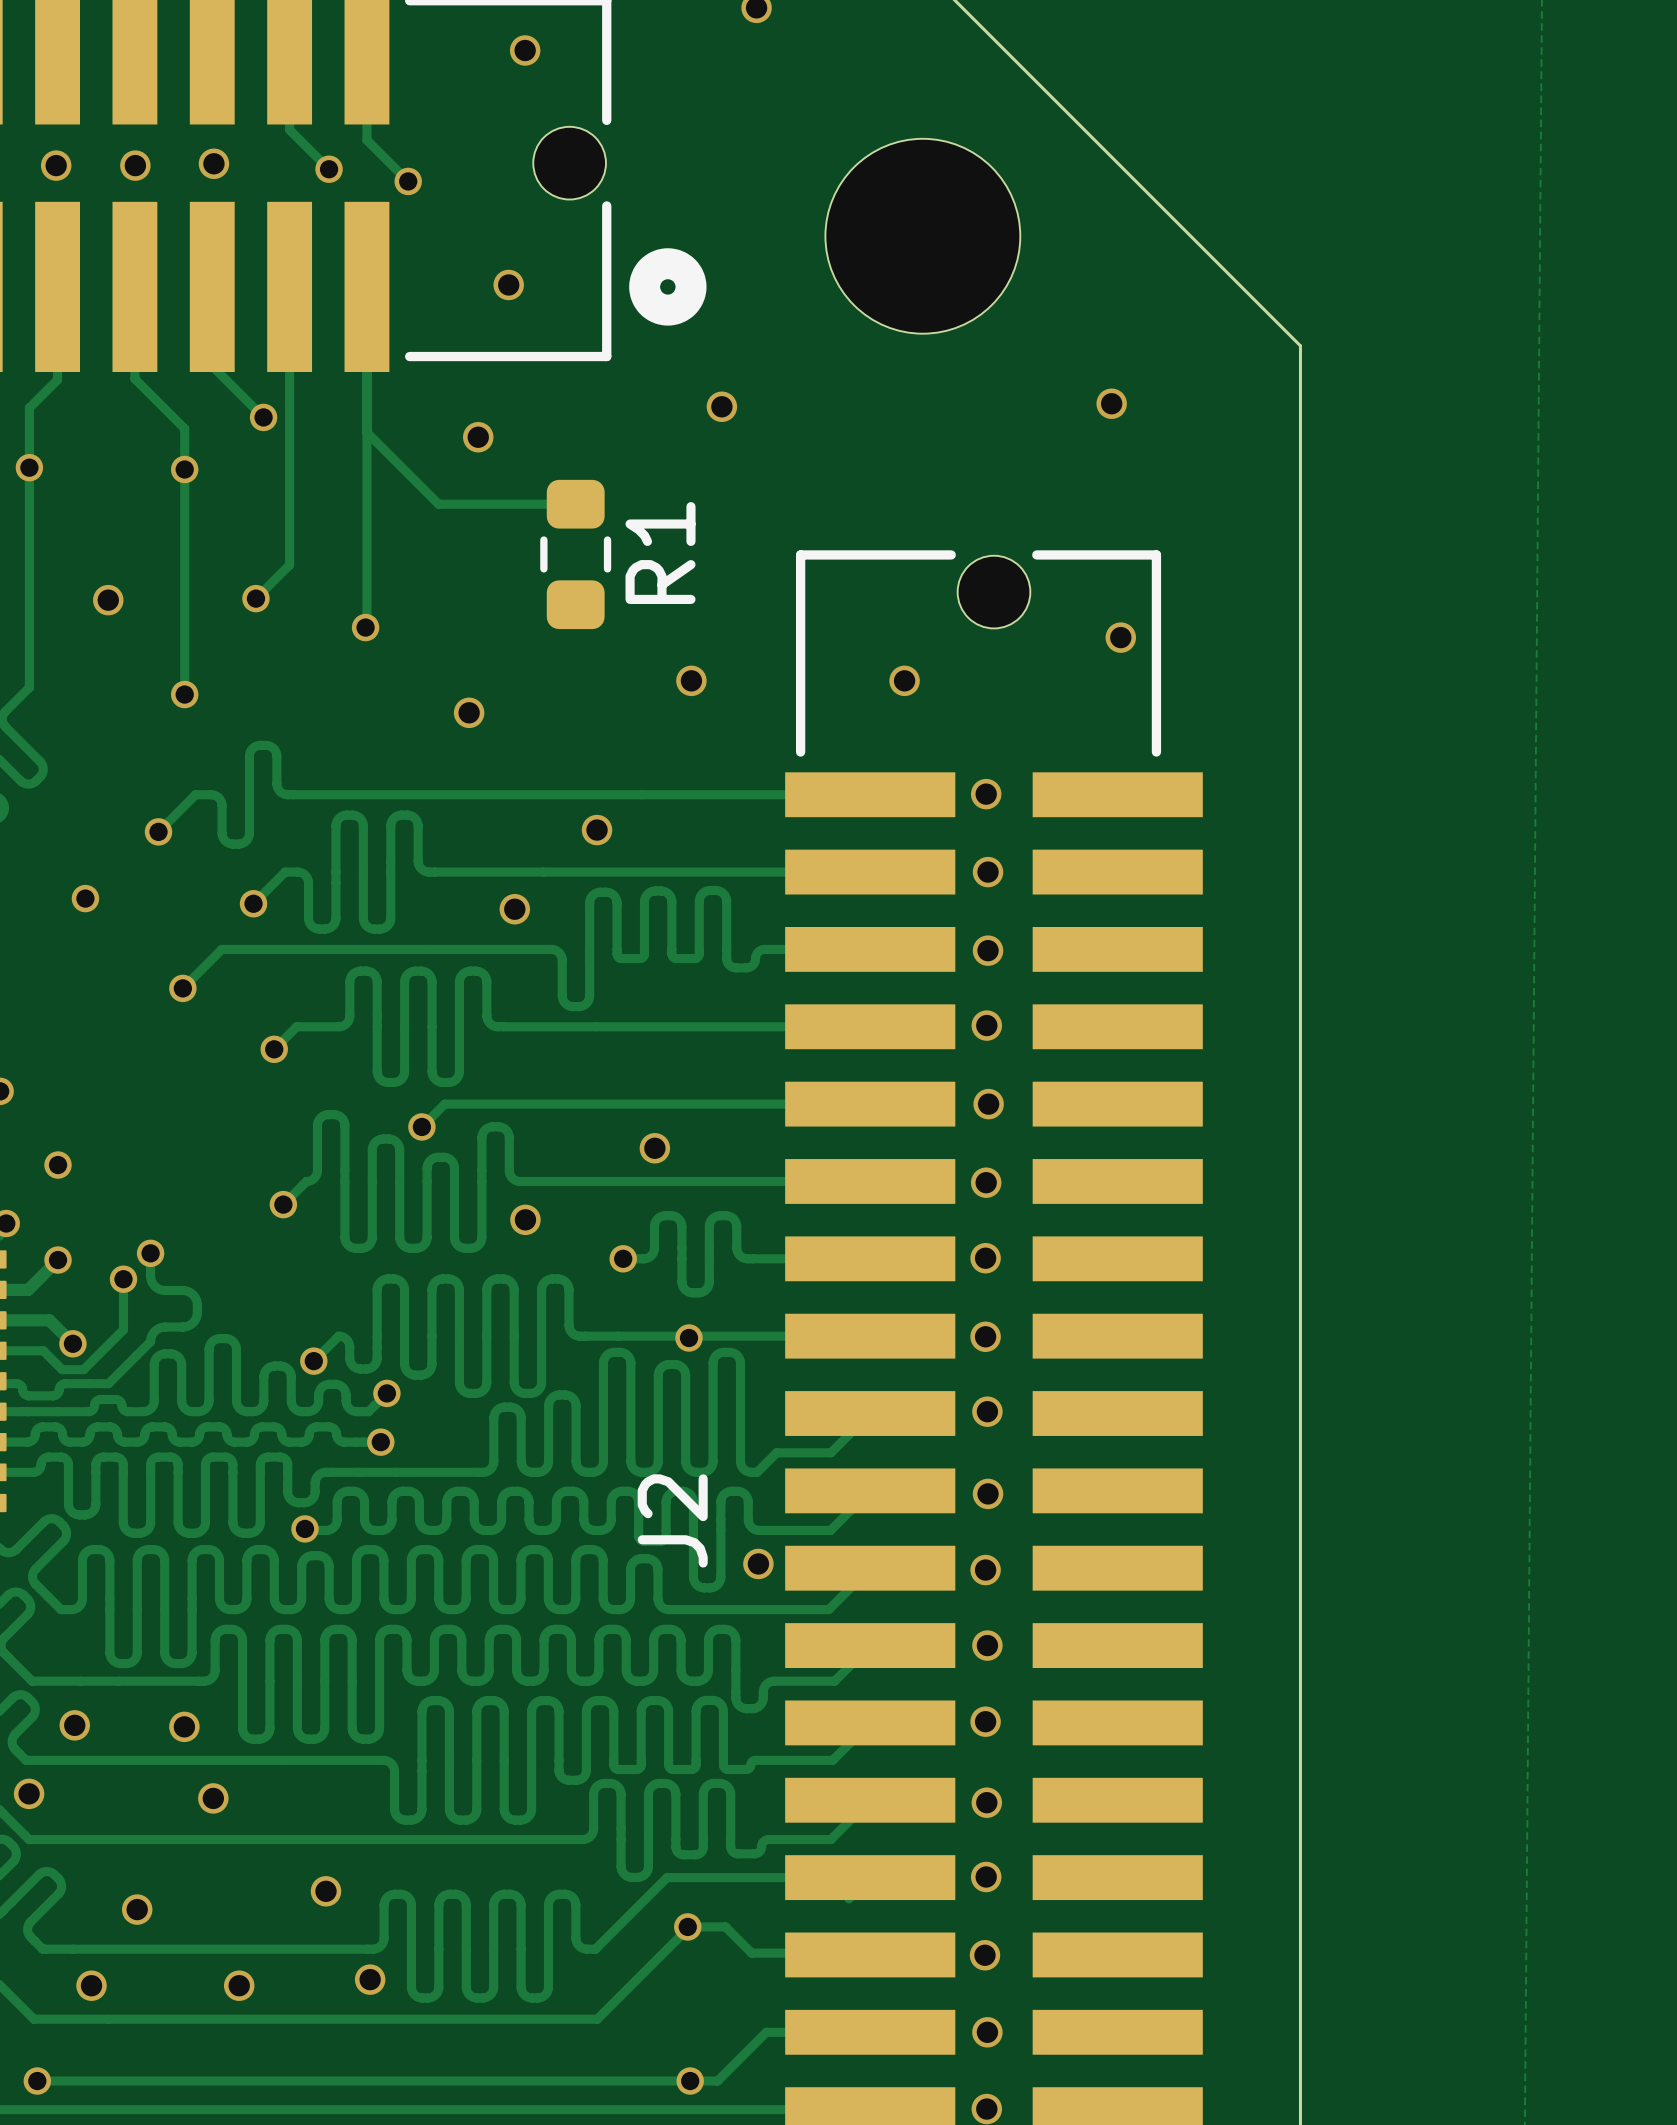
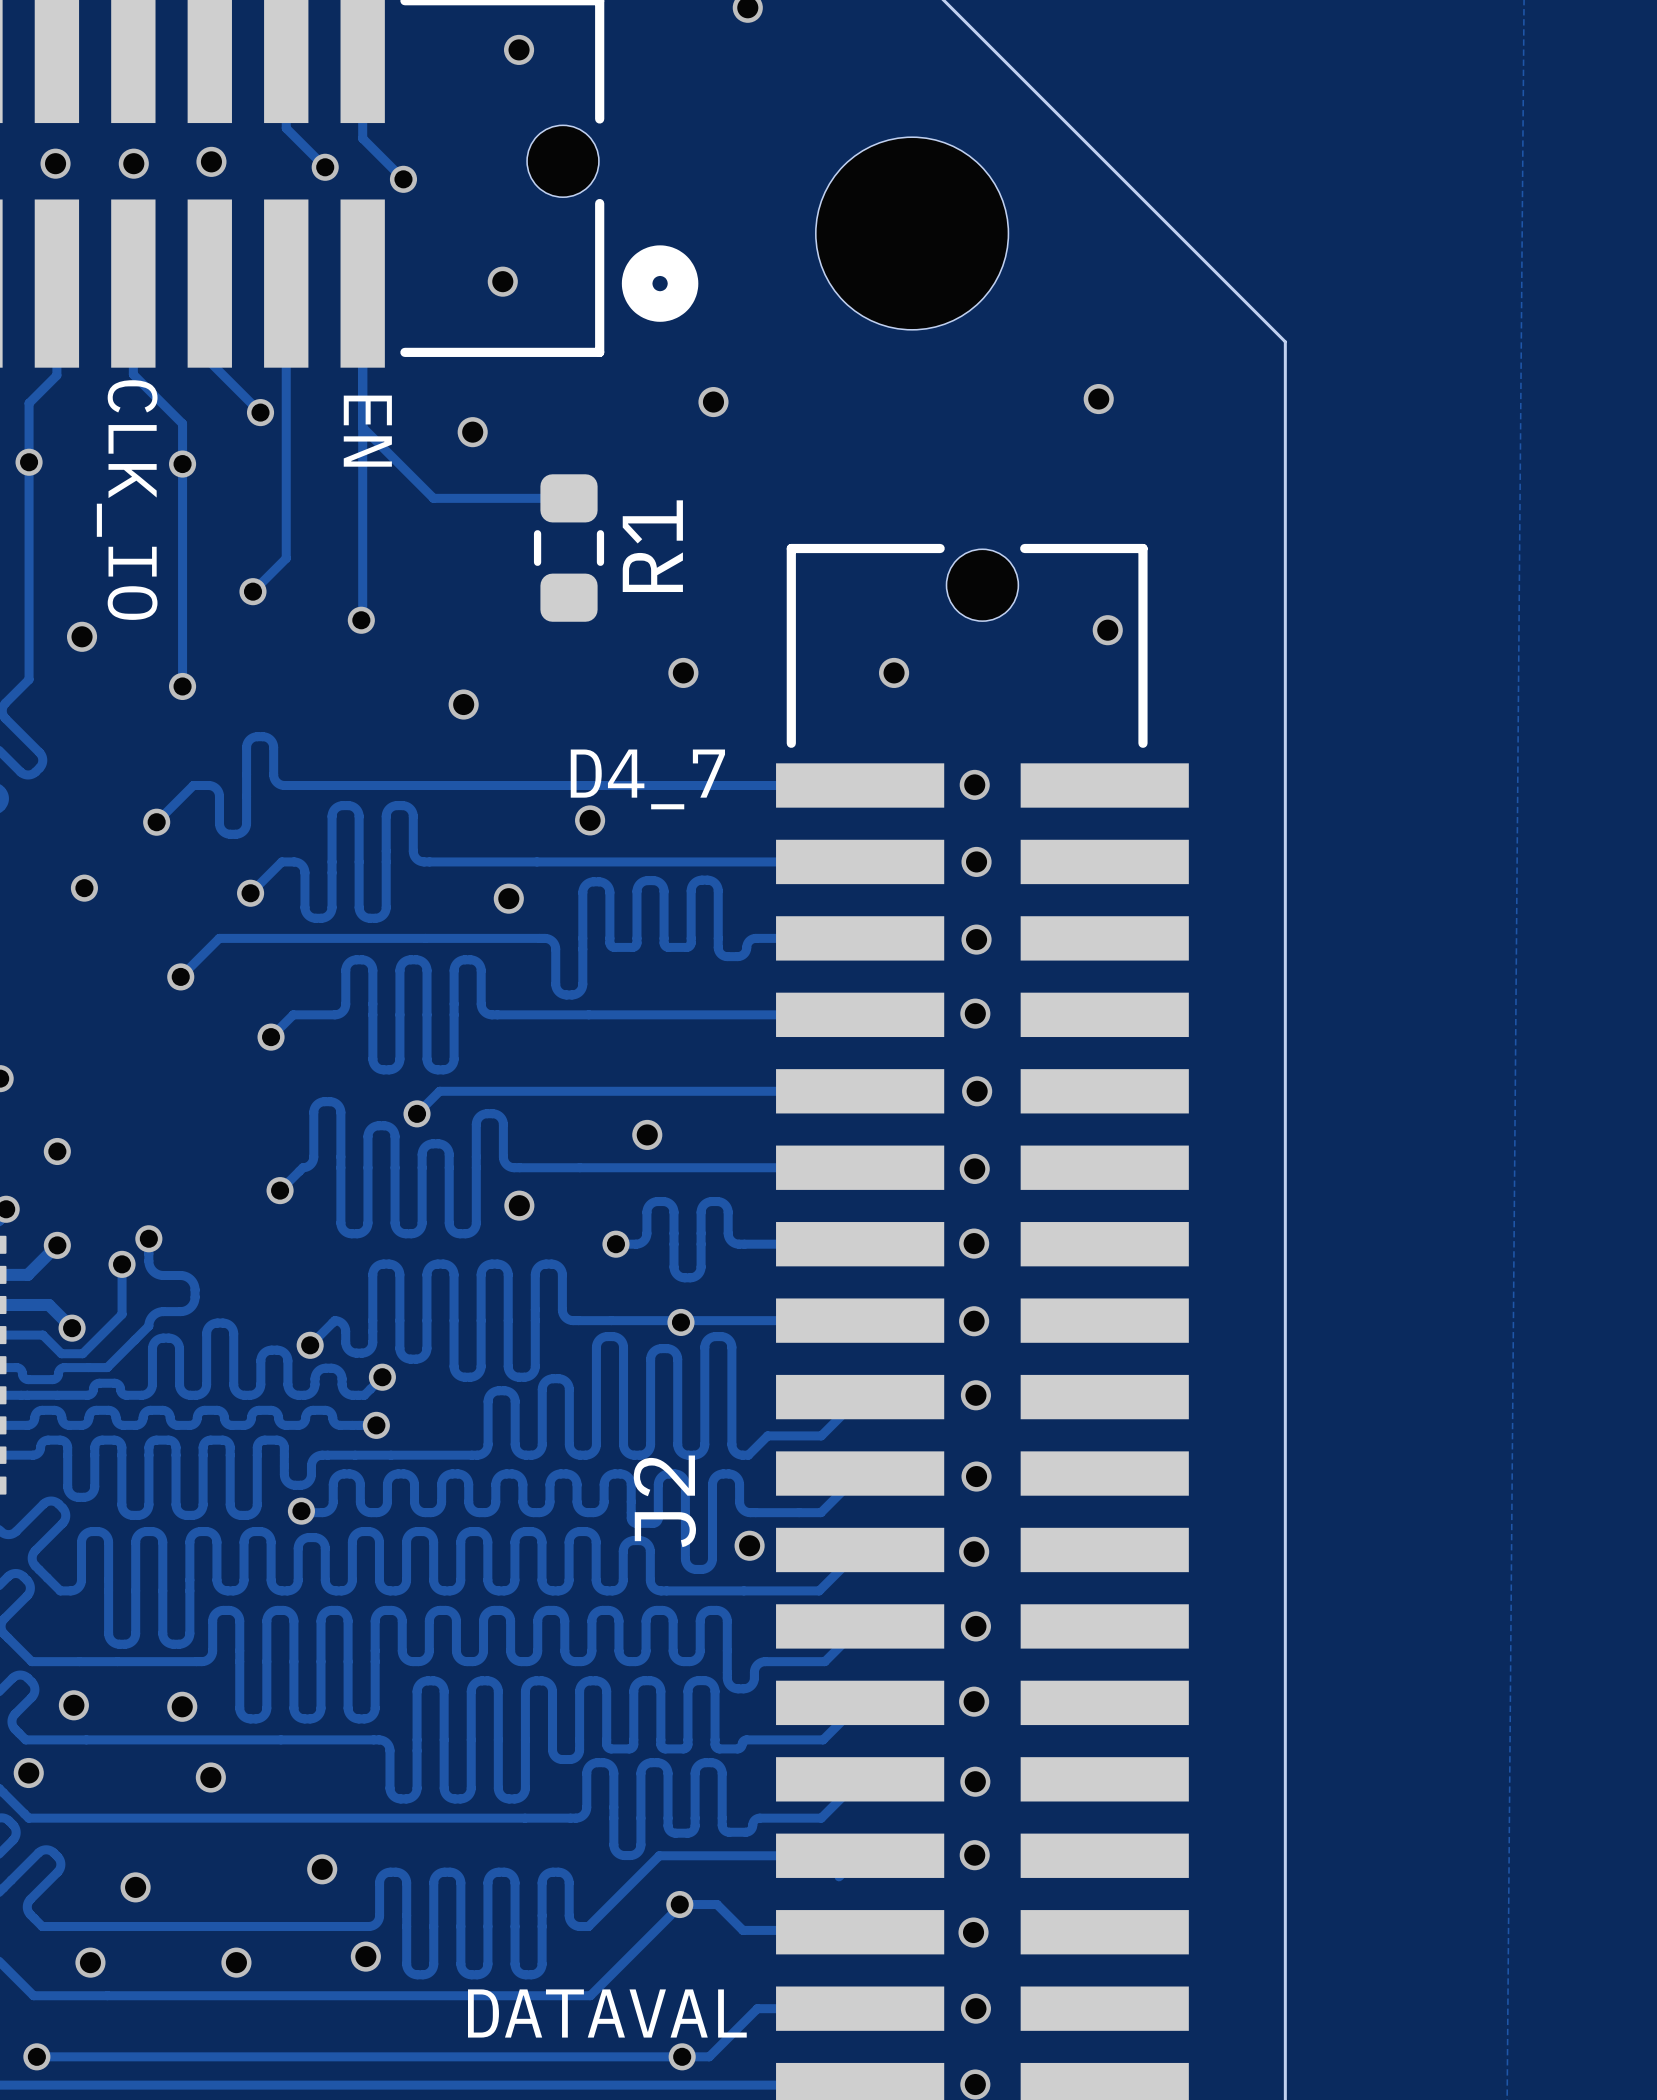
text: none -> EN (367, 431)
text: none -> CLK_IO (127, 500)
via position: (108, 600) -> (82, 636)
text: none -> D4_7 (647, 779)
text: none -> DATAVAL (607, 2013)

